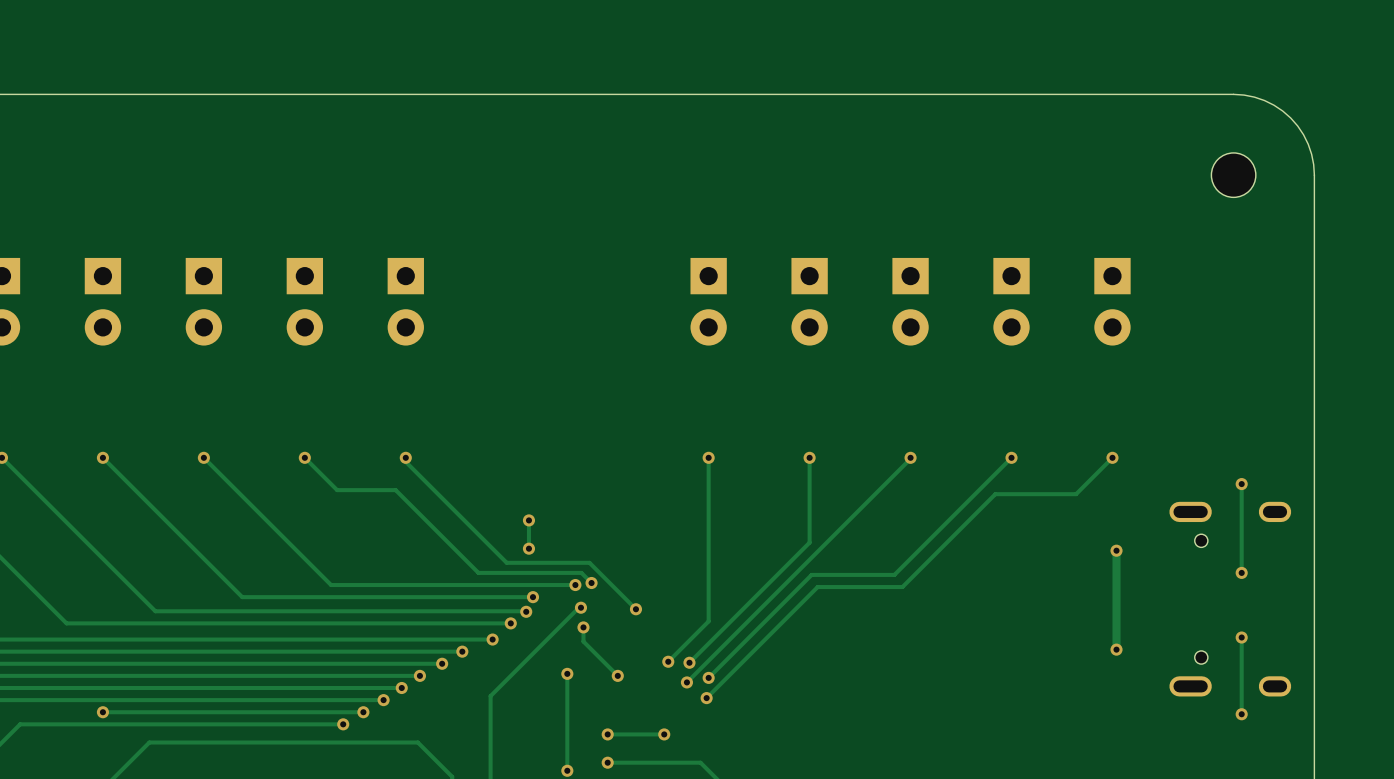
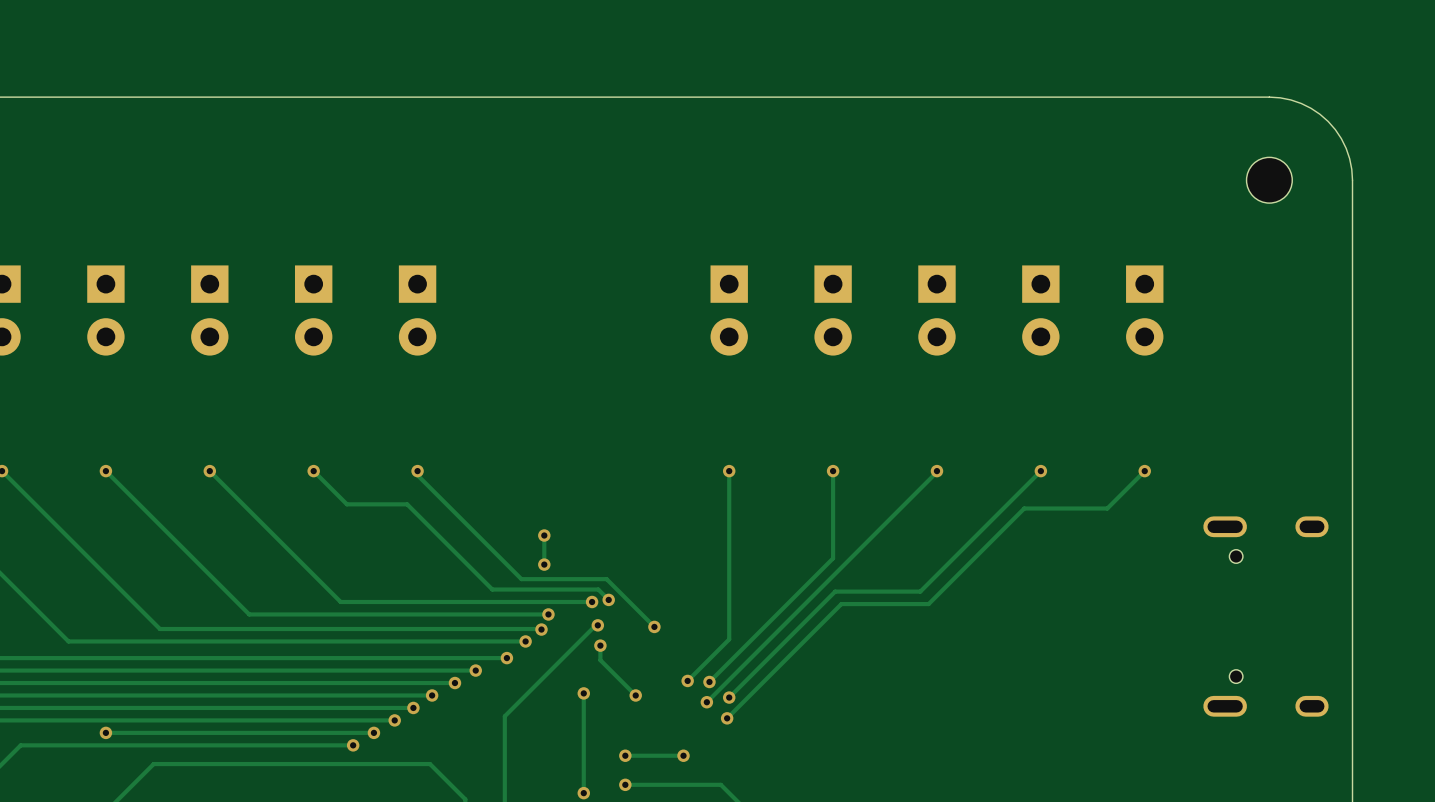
track: (1241, 484) (1241, 572) -> none
via: (1241, 484) -> none
track: (1116, 550) (1116, 649) -> none
via: (1116, 550) -> none
via: (1241, 572) -> none
track: (1241, 637) (1241, 714) -> none
via: (1241, 637) -> none
via: (1116, 649) -> none
via: (1241, 714) -> none

